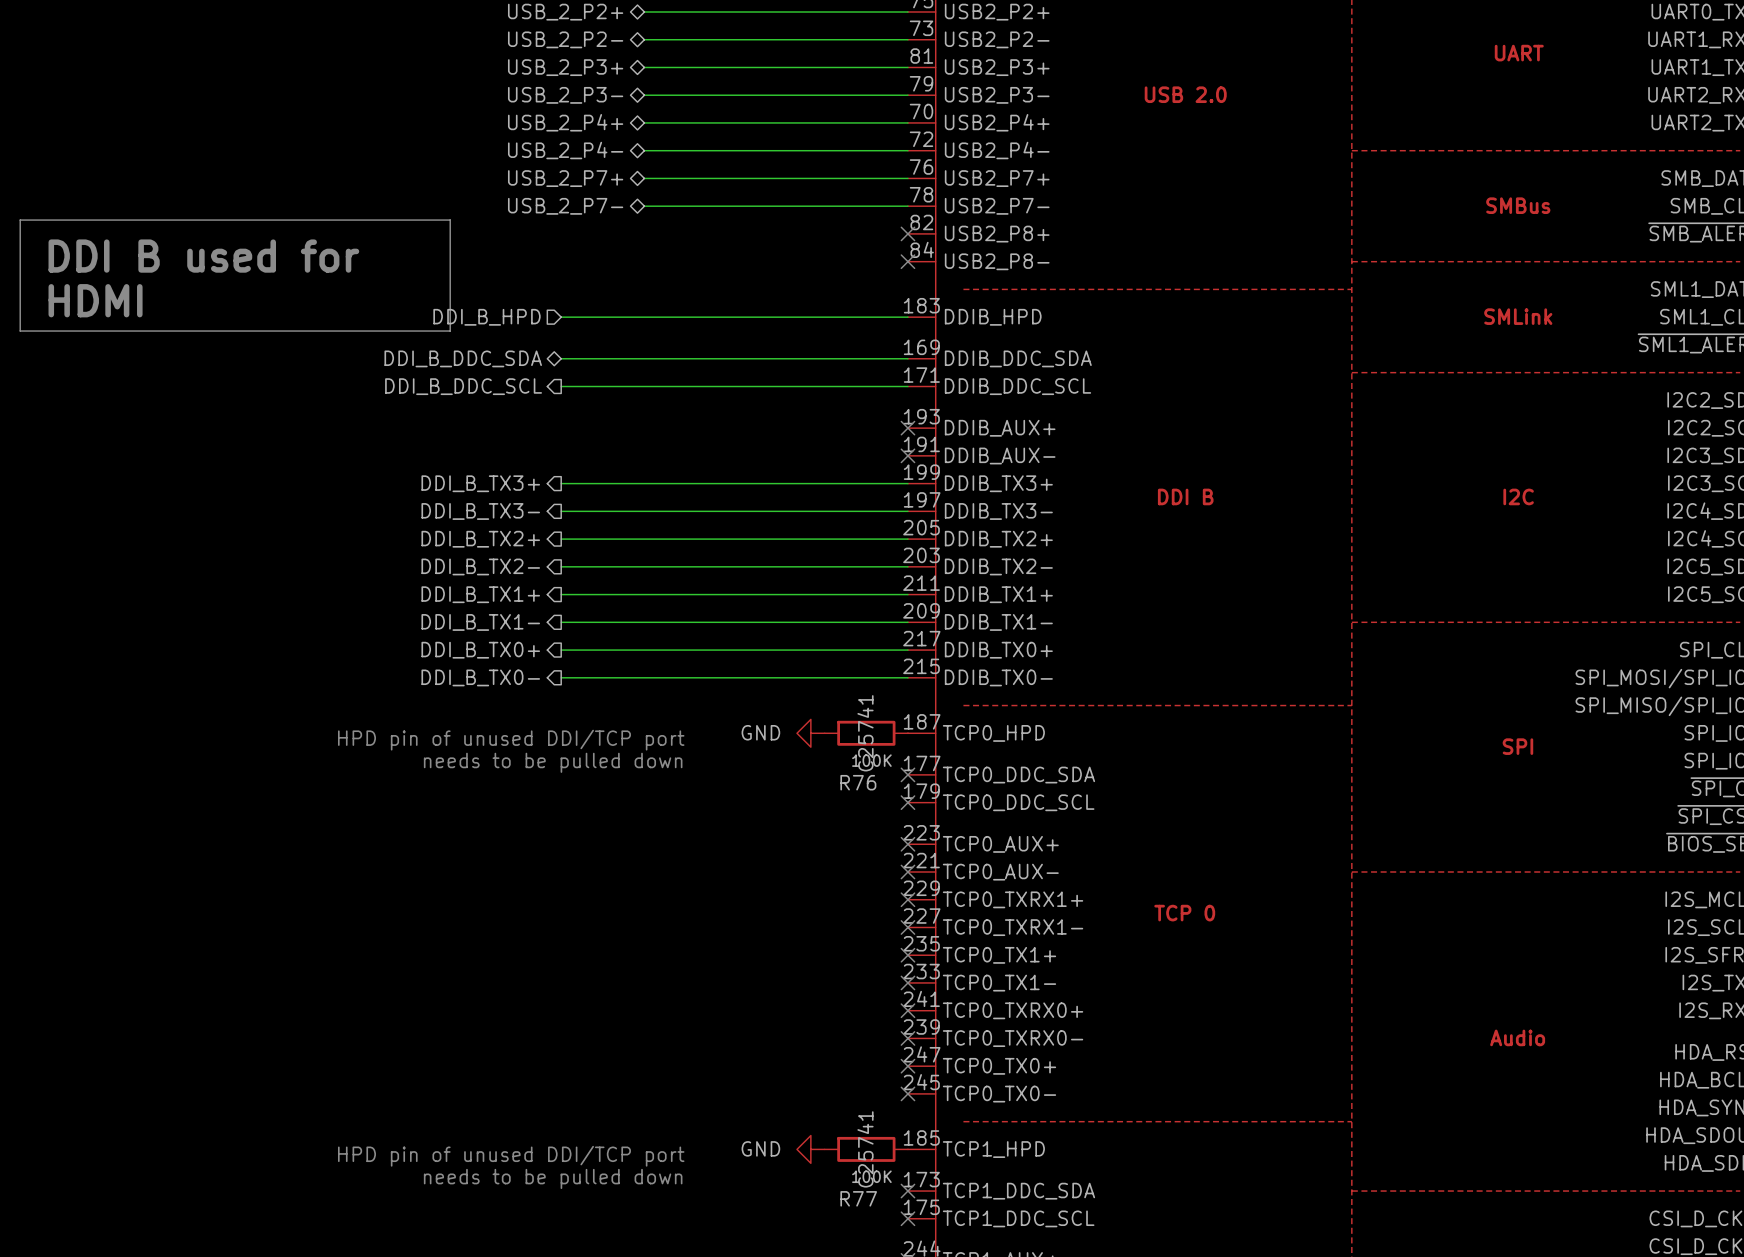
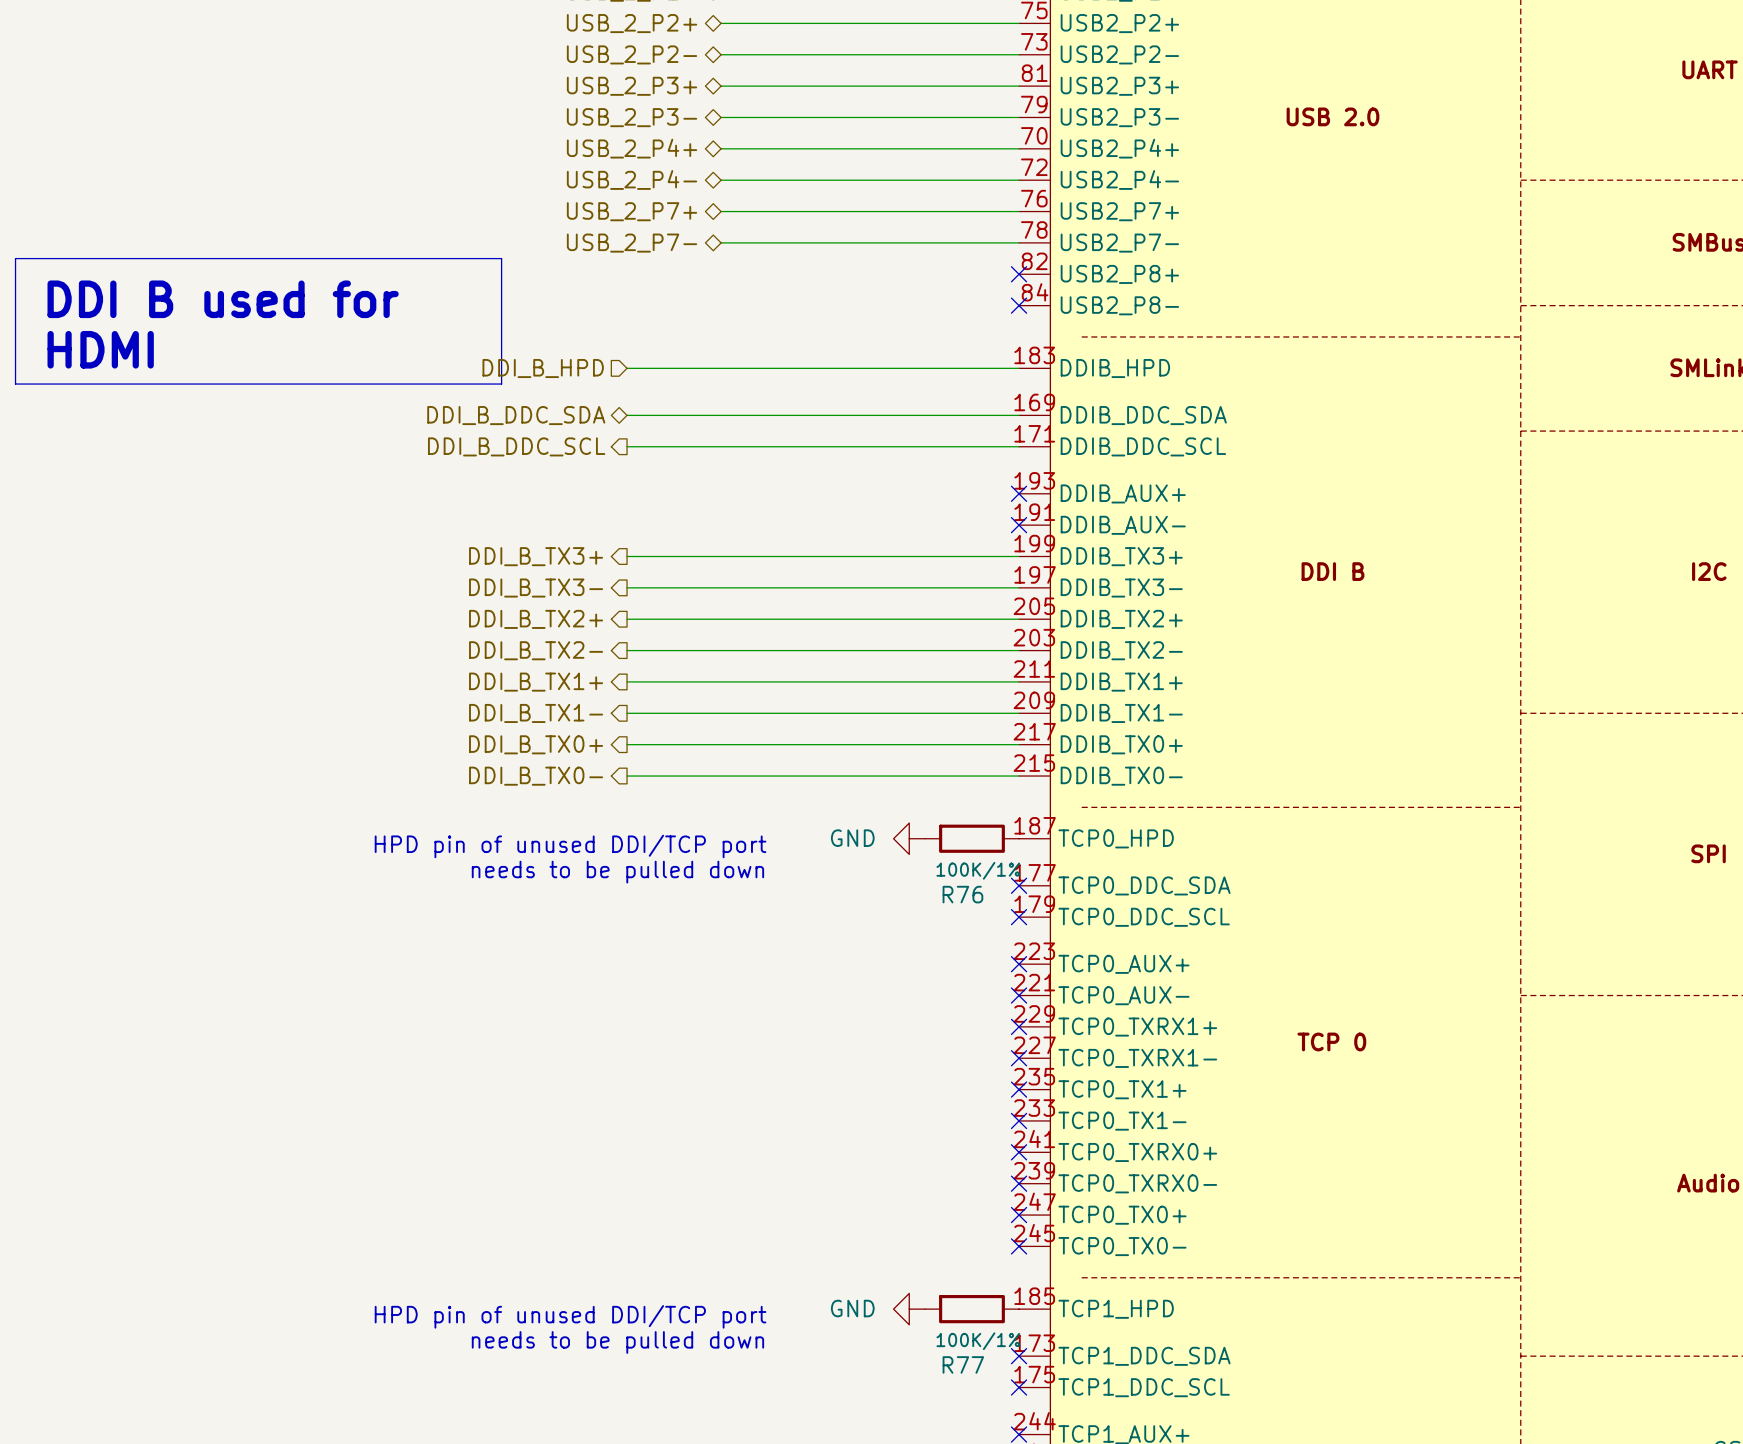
R76 text: C25741 (865, 733) -> none
R76 value: 100K (871, 760) -> 100K/1% (978, 870)
R77 text: C25741 (865, 1149) -> none
R77 value: 100K (871, 1176) -> 100K/1% (978, 1341)

